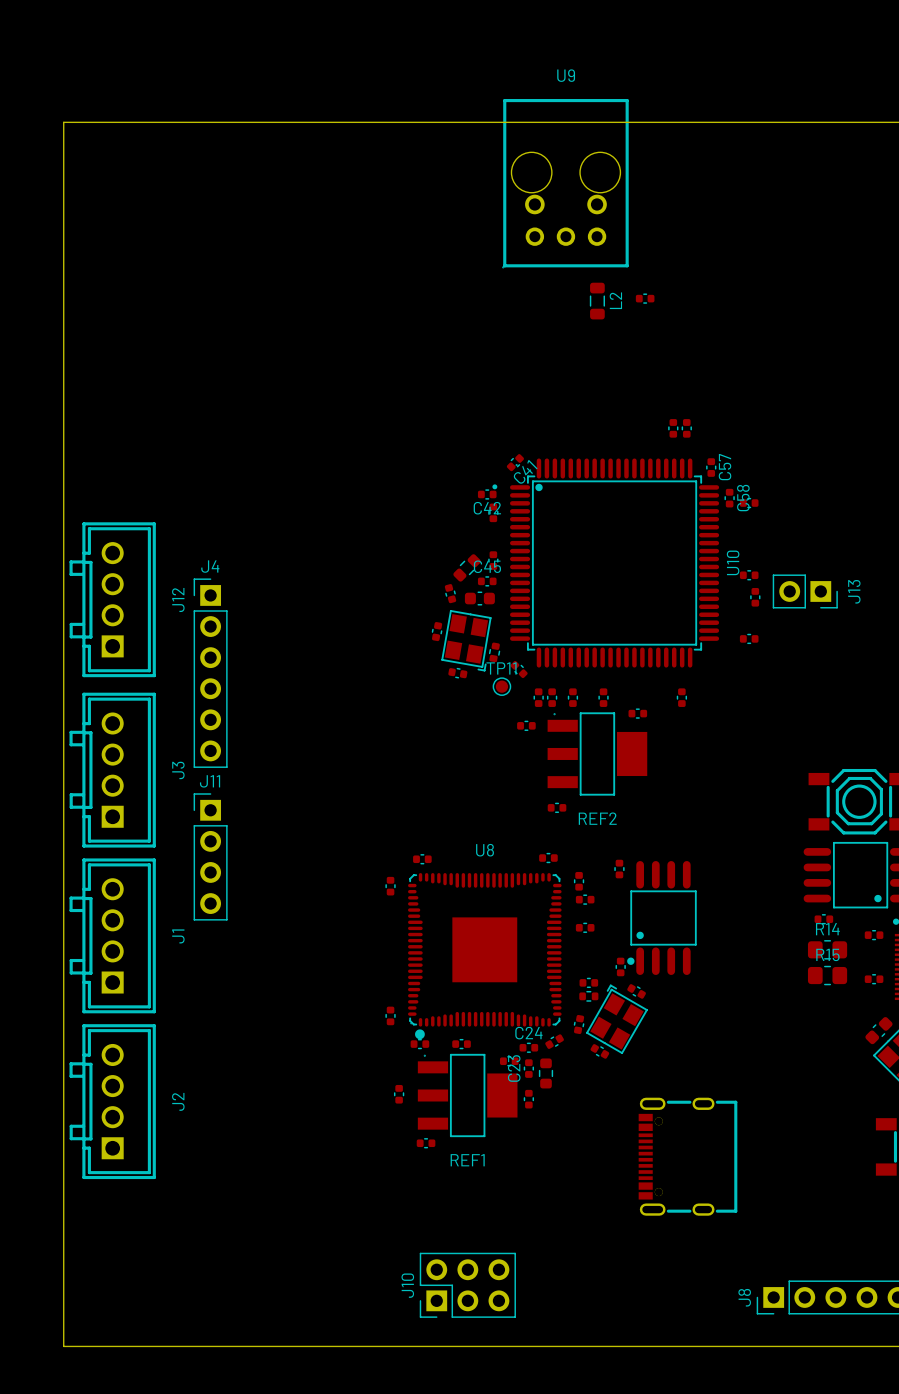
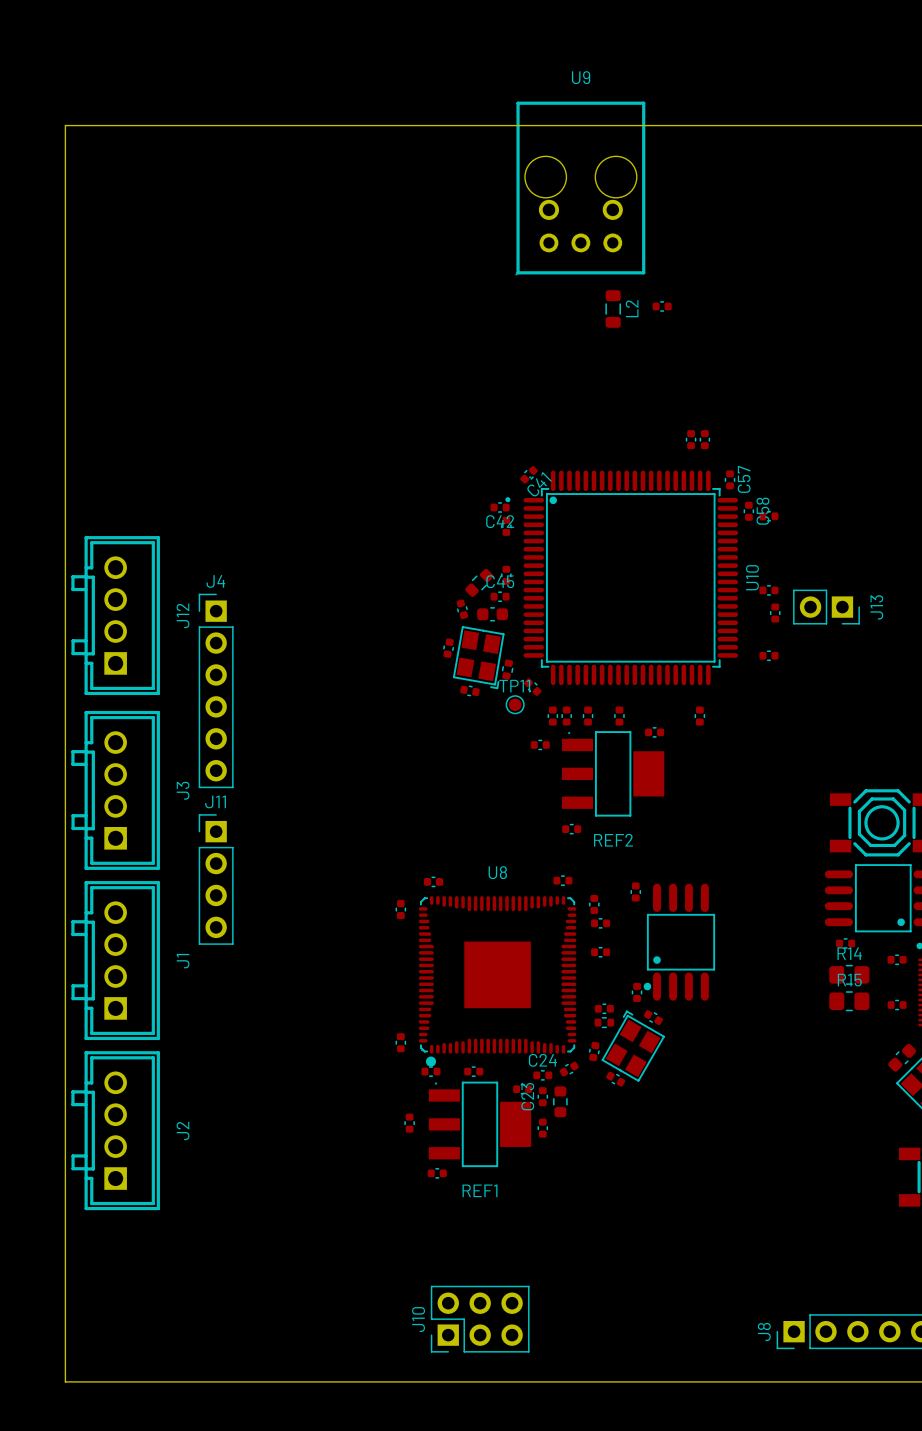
part: (688, 1156) -> none

